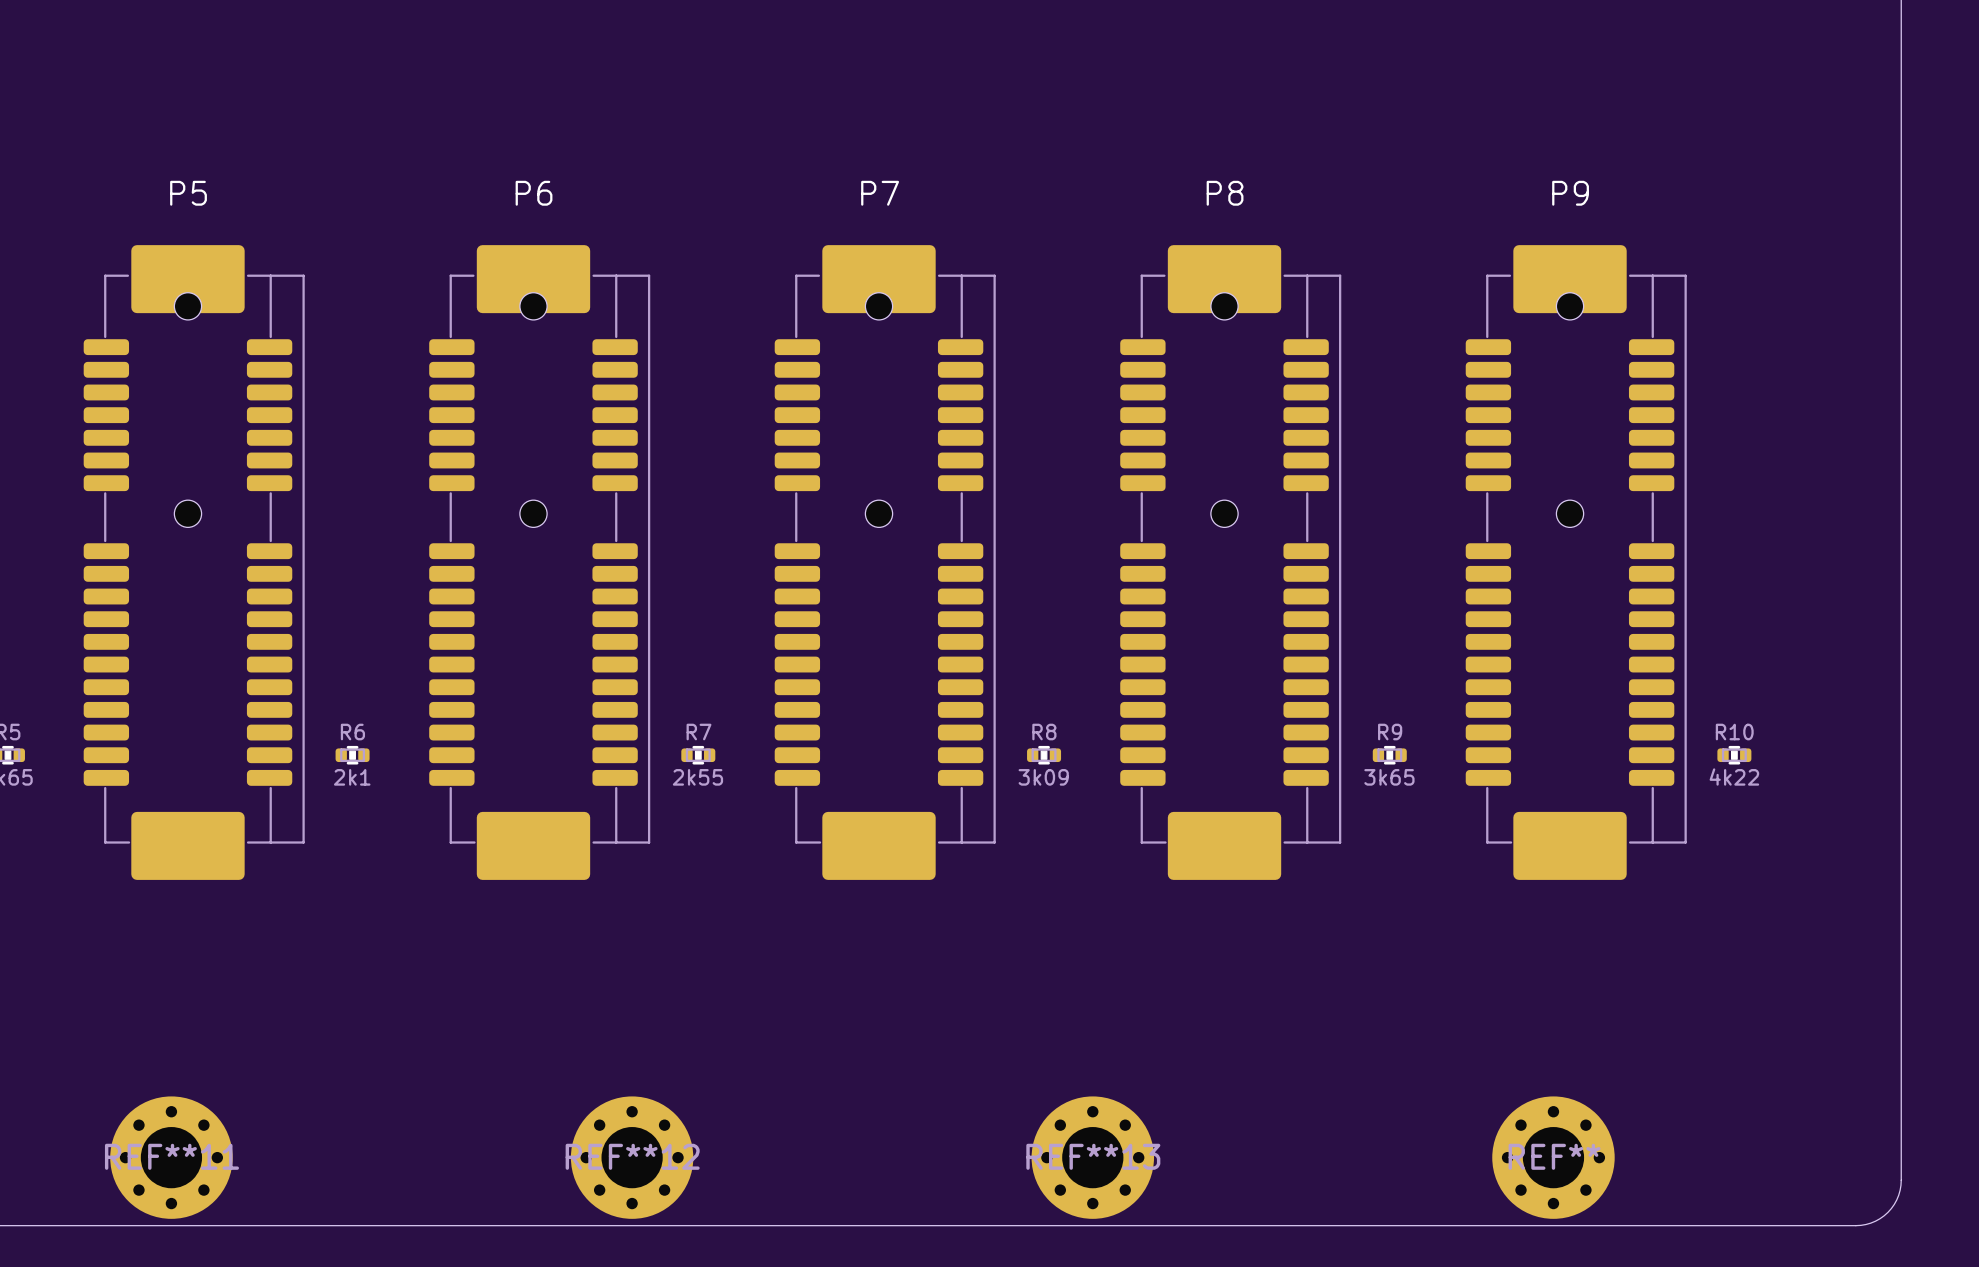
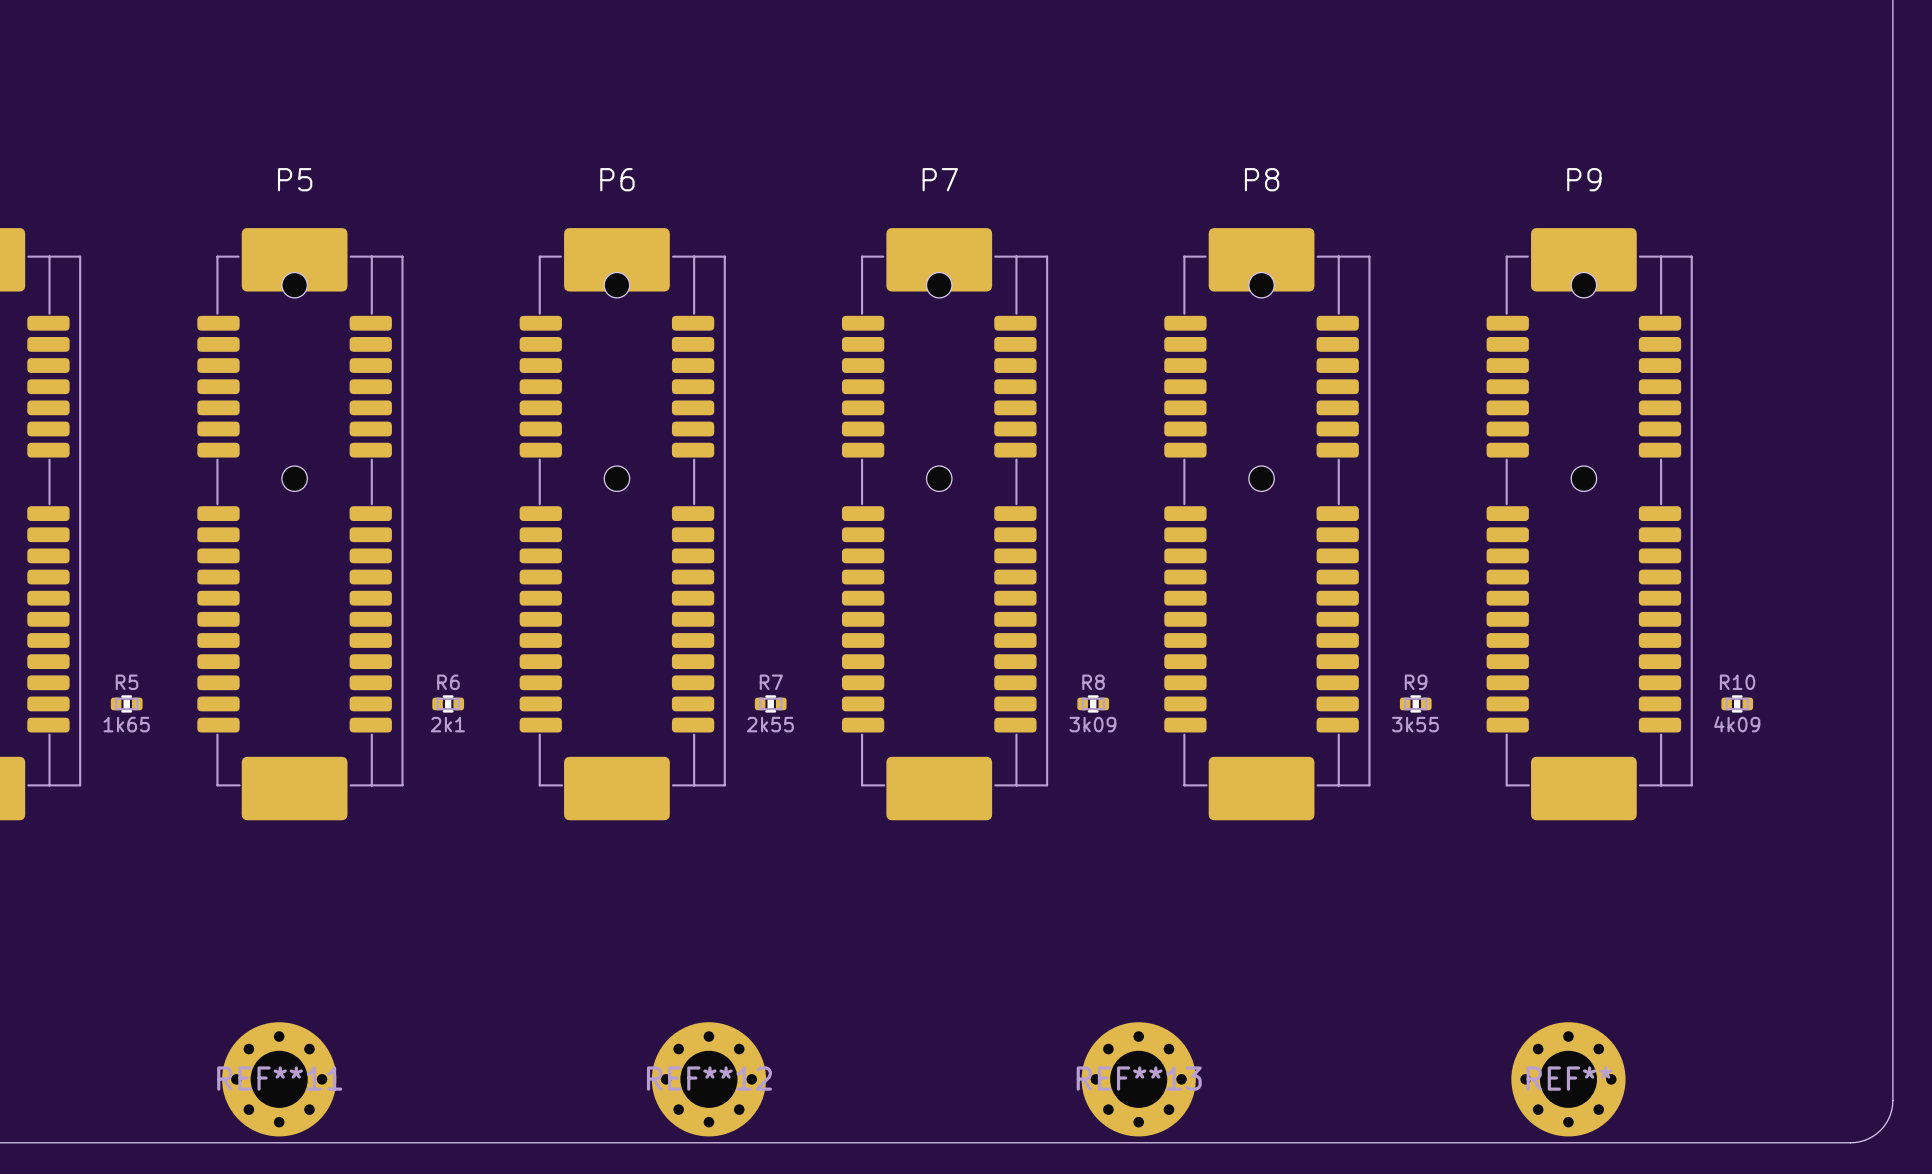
R9 value: 3k65 (1389, 777) -> 3k55 (1415, 724)
R10 value: 4k22 (1734, 777) -> 4k09 (1737, 724)

